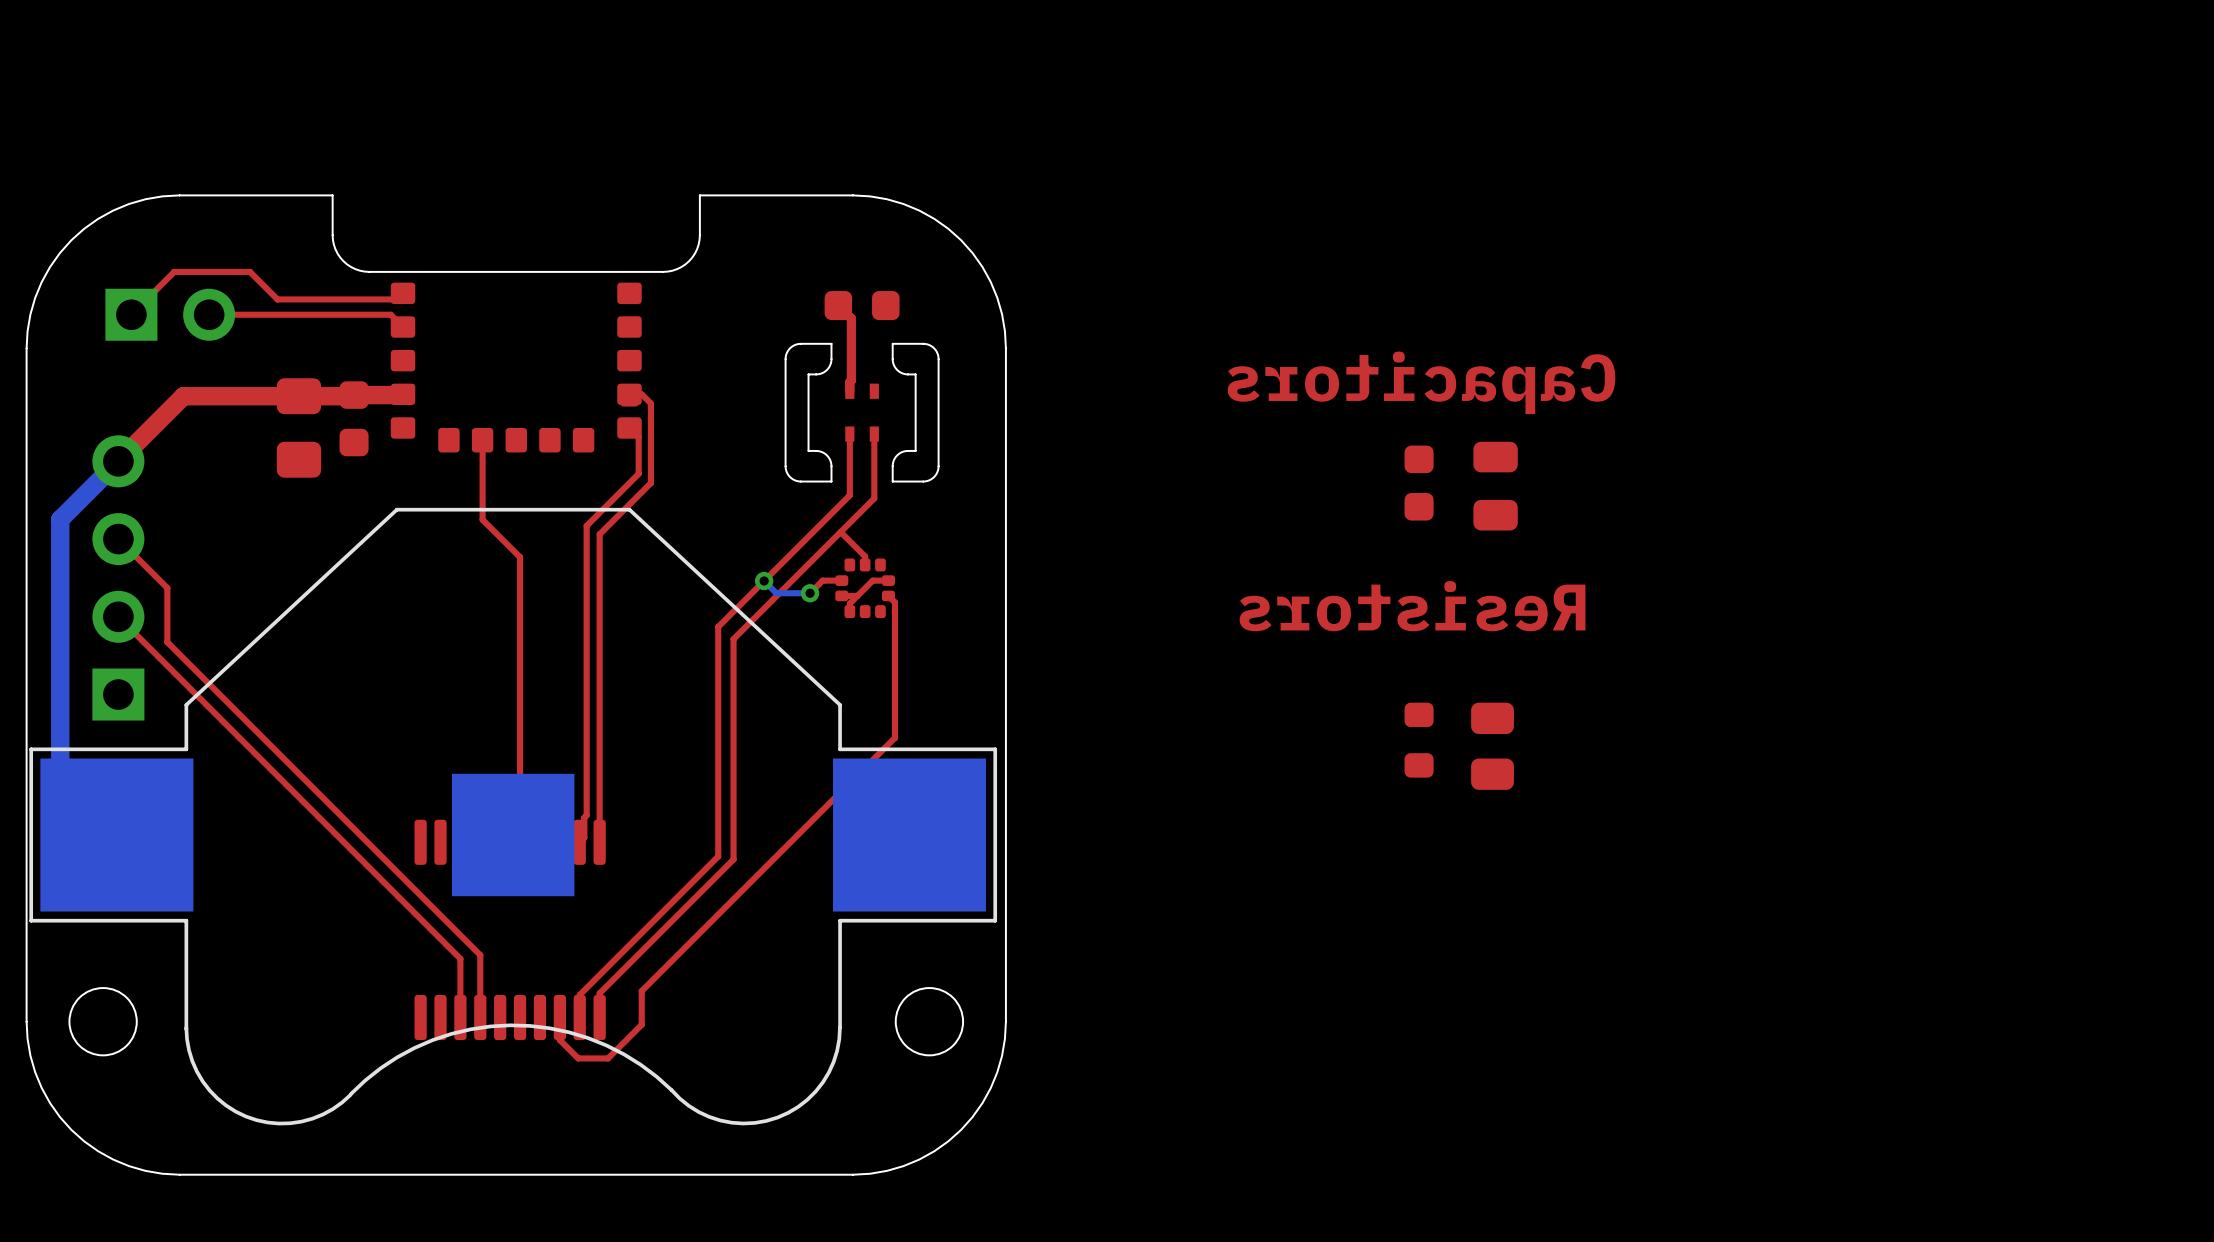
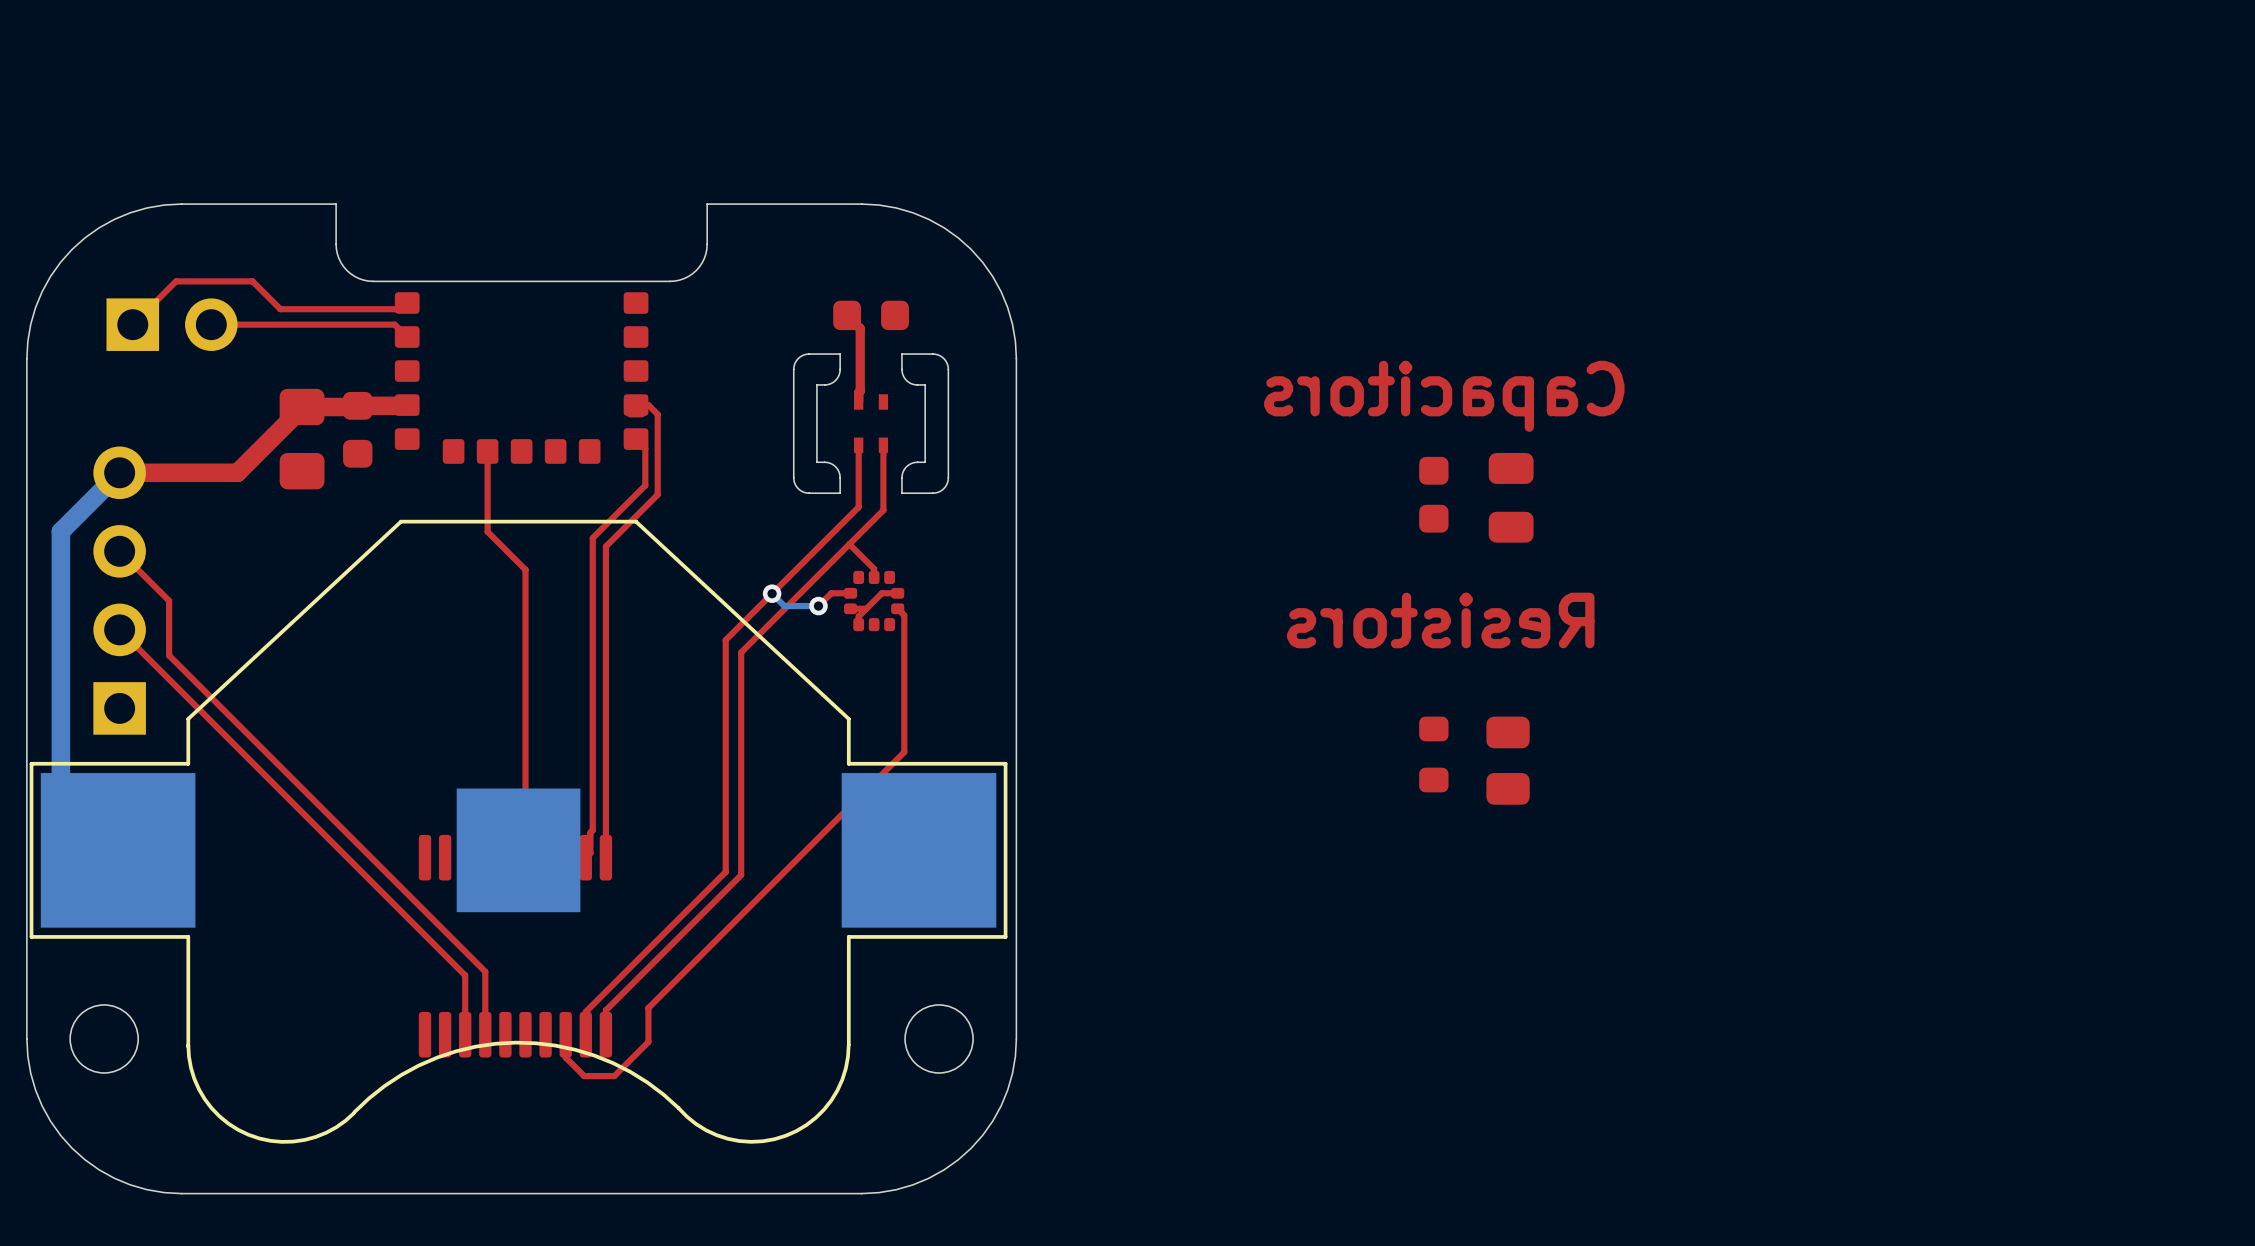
top track: (298, 396) (183, 396) (118, 461) -> (302, 407) (237, 472) (119, 472)

